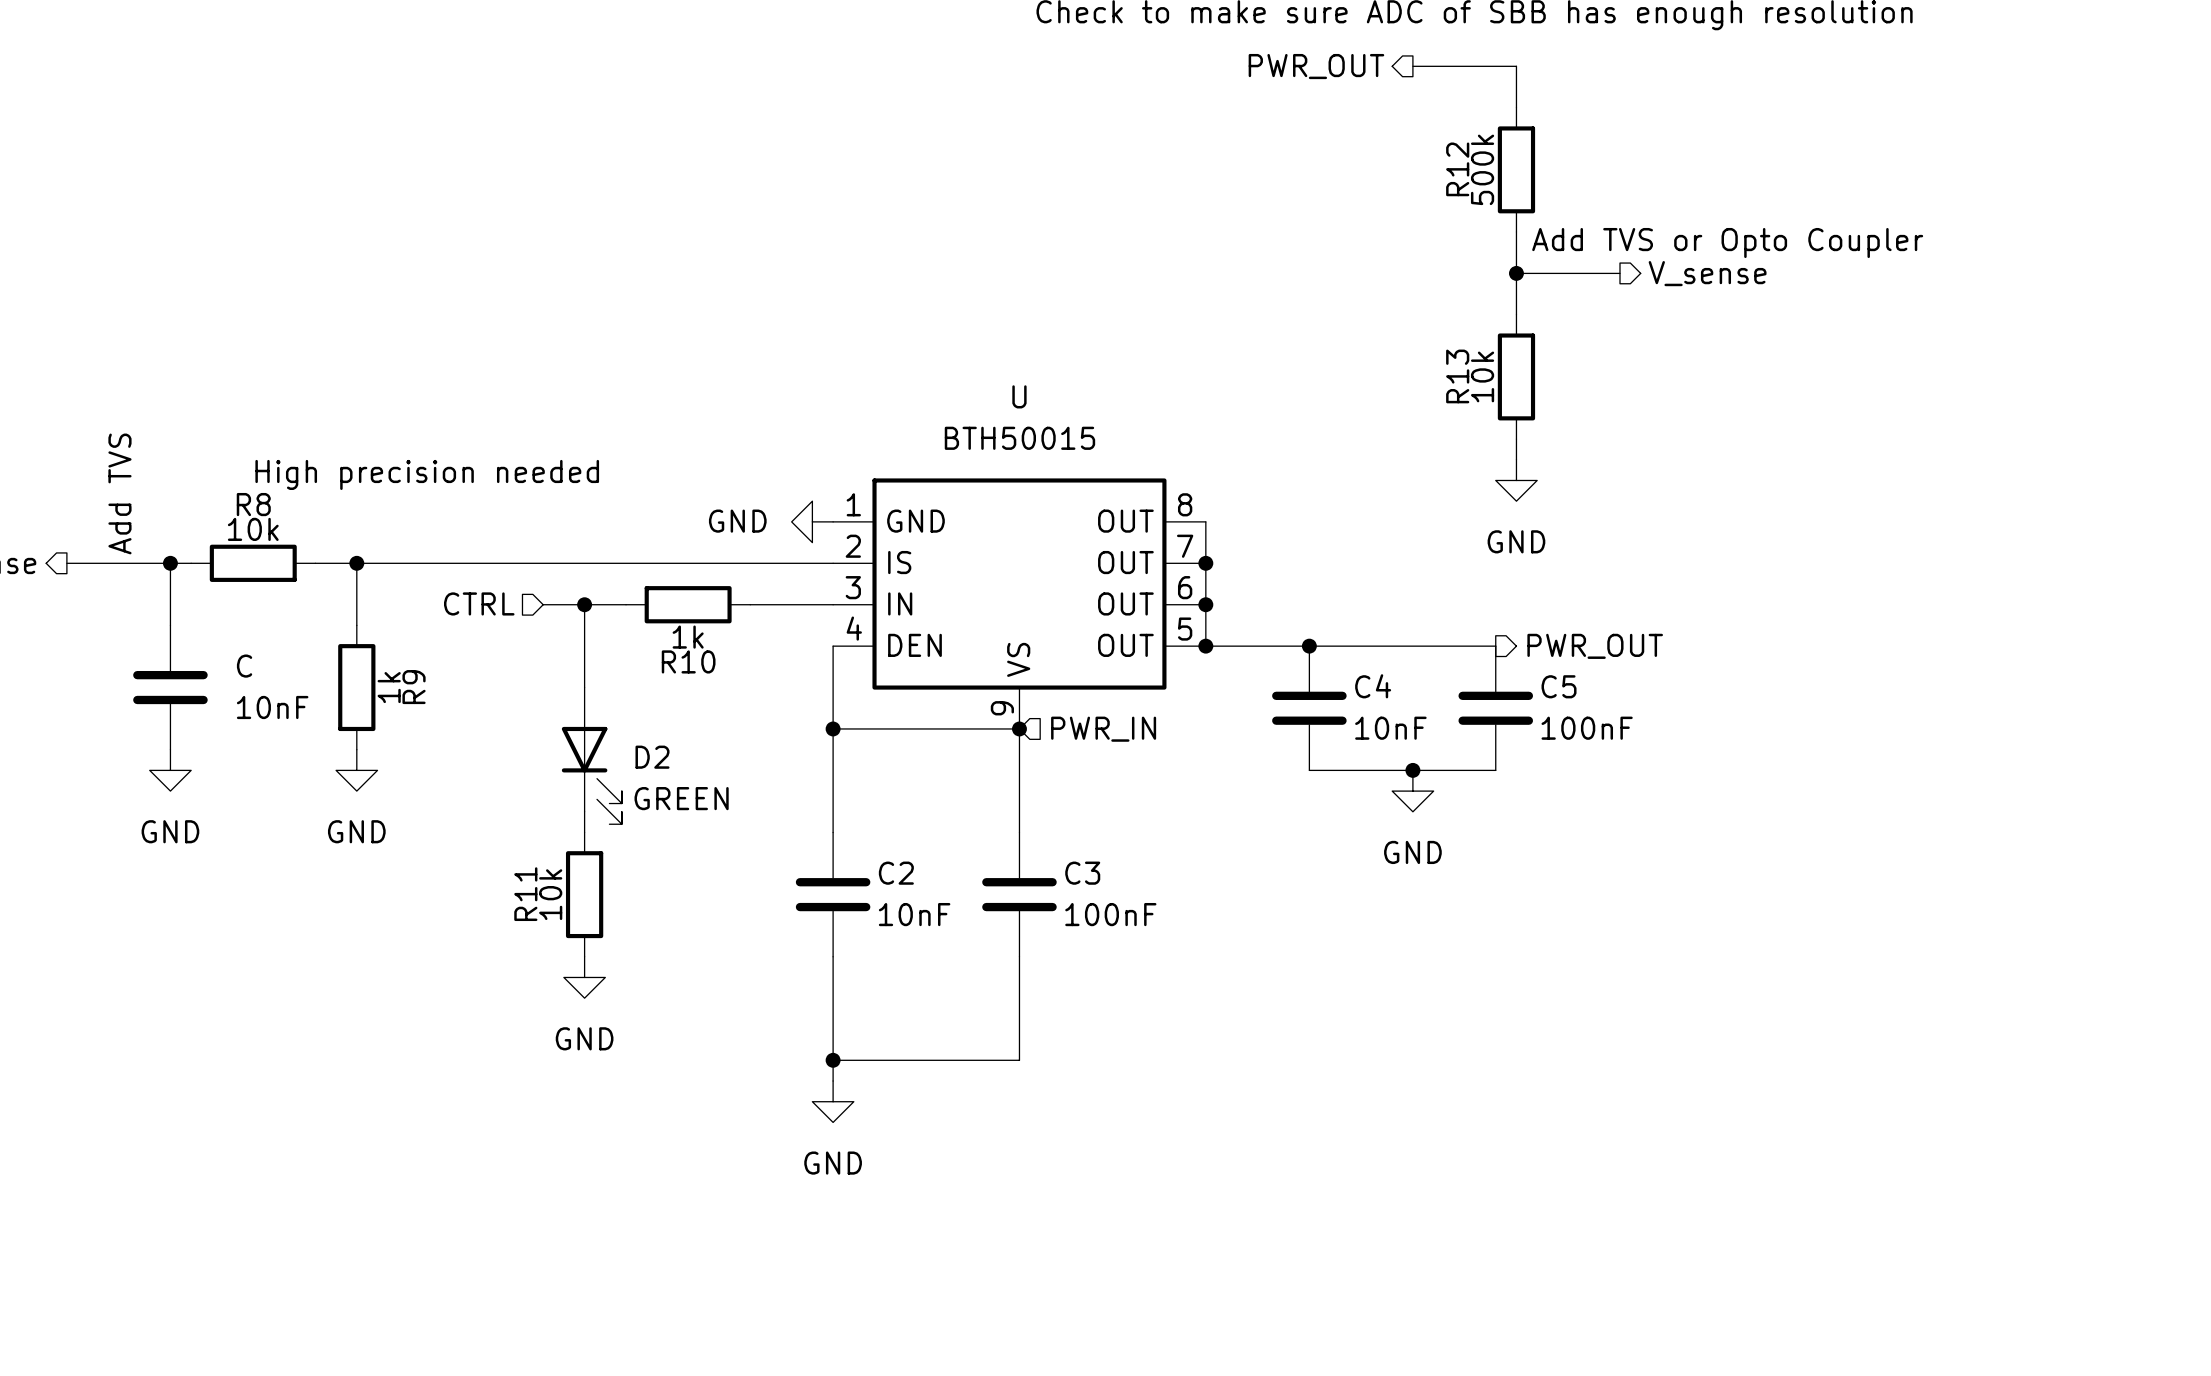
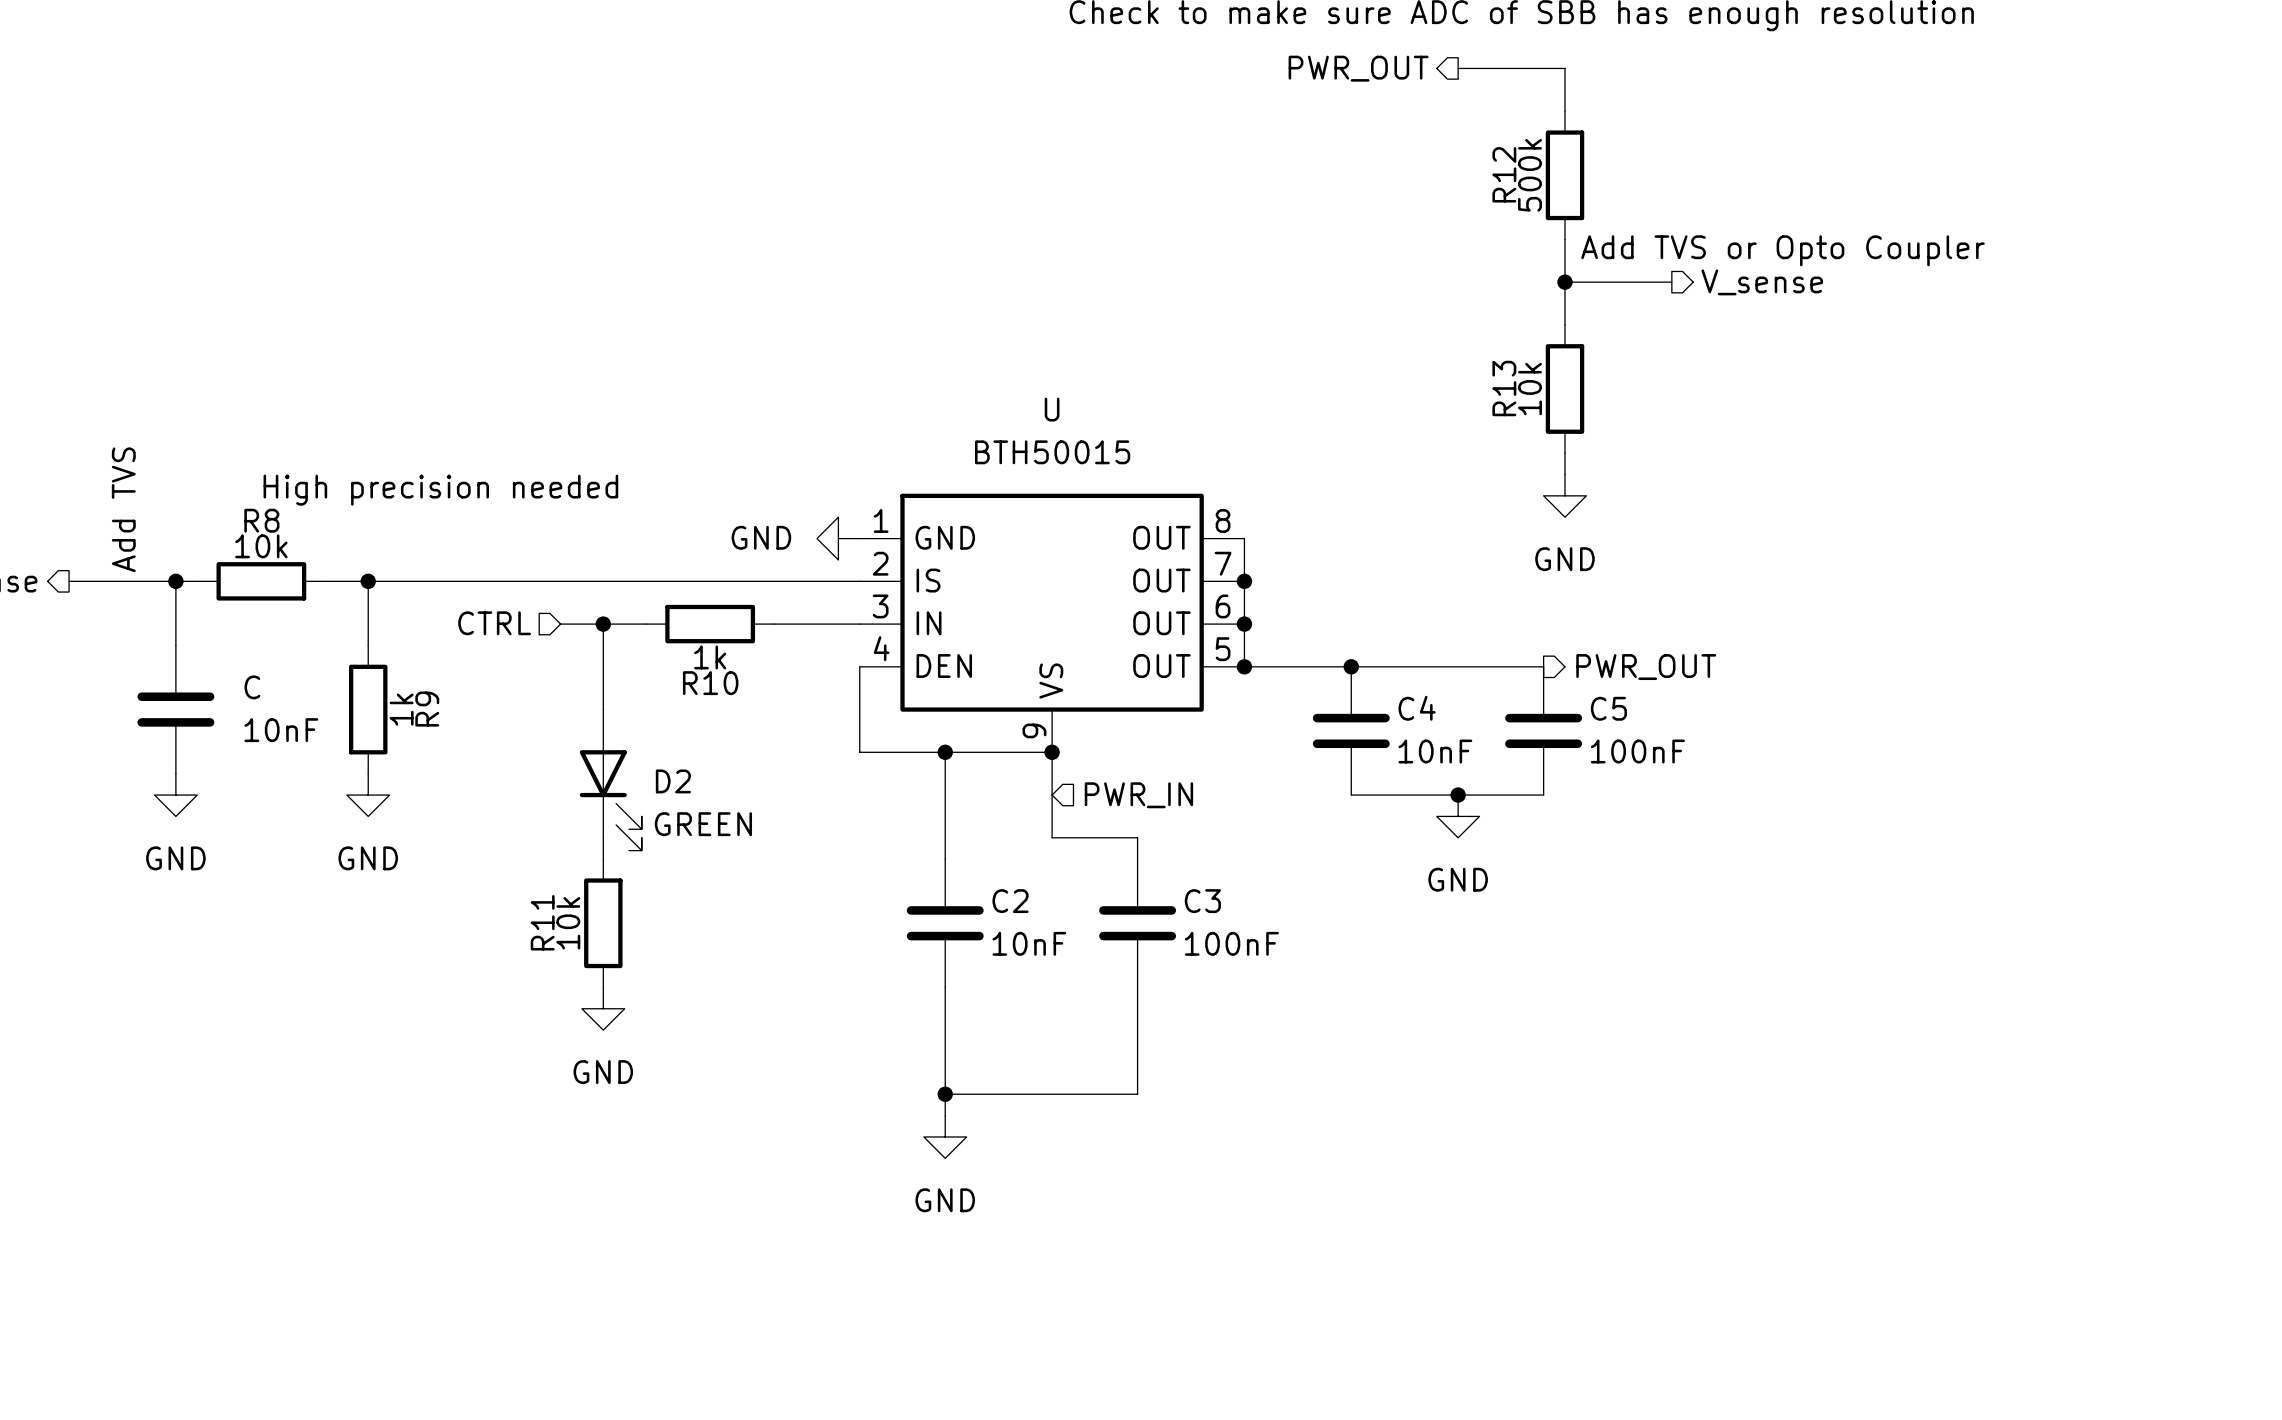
wire: (833, 728) (833, 832) -> (945, 752) (945, 859)
junction position: (833, 728) -> (945, 752)
hierarchical label position: PWR_IN (1103, 729) -> PWR_IN (1138, 795)
wire: (1019, 811) (1019, 832) -> (1052, 837) (1137, 837) (1137, 859)
C2 position: (833, 894) -> (945, 923)
C3 position: (1019, 894) -> (1137, 923)
wire: (833, 956) (833, 1081) -> (945, 987) (945, 1115)
wire: (1019, 956) (1019, 1060) -> (1137, 987) (1137, 1094) (1052, 1094)
wire: (833, 1060) (915, 1060) -> none
junction position: (833, 1060) -> (945, 1094)
power symbol position: GND (833, 1101) -> GND (945, 1136)

